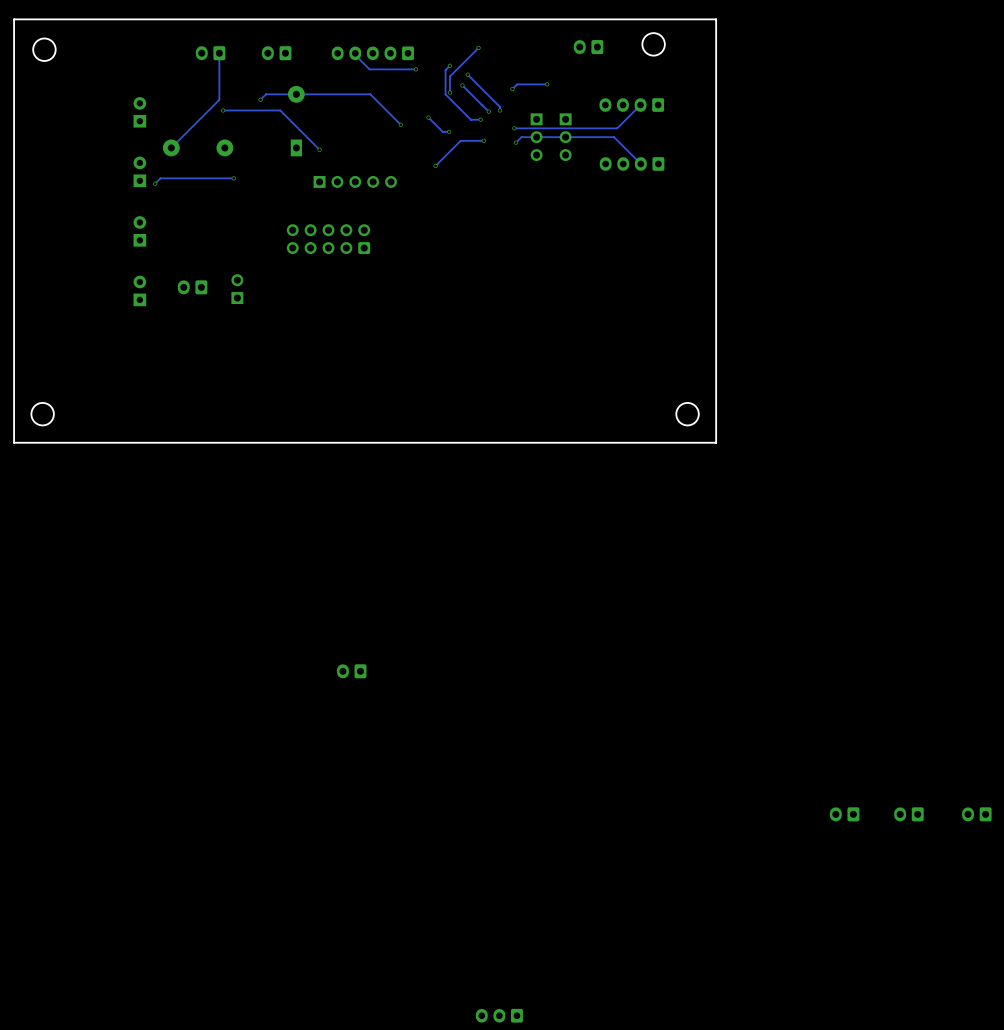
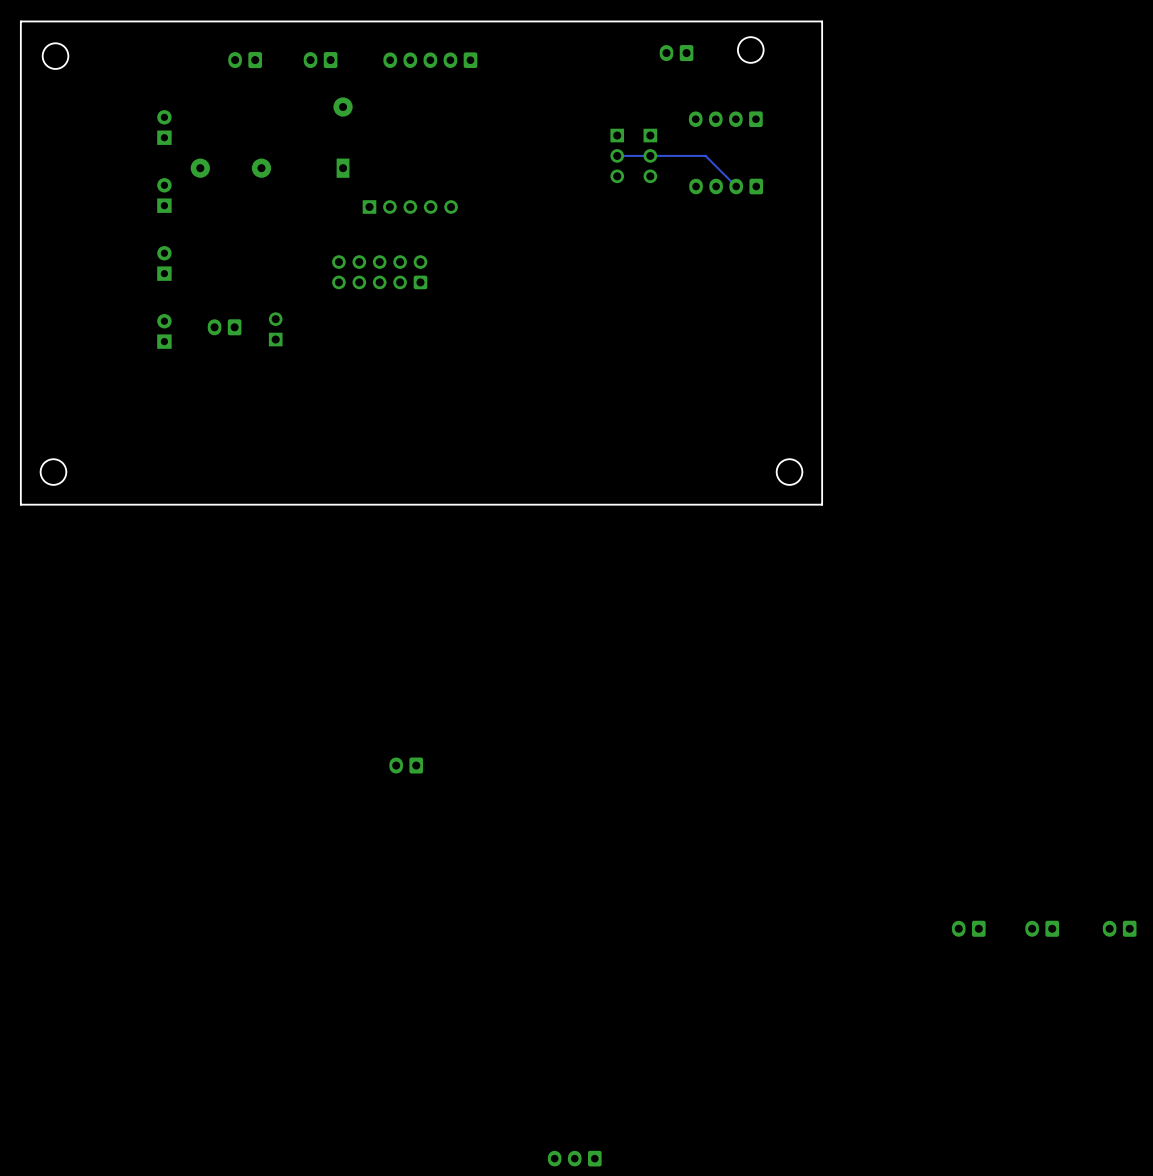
track: (478, 47) (449, 76) (449, 92) -> none
via: (478, 47) -> none
track: (219, 53) (219, 99) (171, 147) -> none
track: (355, 53) (369, 69) (416, 69) -> none
track: (449, 65) (445, 70) (445, 94) (470, 119) (480, 119) -> none
via: (449, 65) -> none
via: (416, 69) -> none
track: (467, 74) (499, 106) (499, 110) -> none
via: (467, 74) -> none
track: (547, 84) (517, 84) (512, 89) -> none
via: (547, 84) -> none
track: (462, 85) (488, 111) -> none
via: (462, 85) -> none
via: (512, 89) -> none
via: (449, 92) -> none
track: (260, 99) (266, 94) (370, 94) (400, 124) -> none
via: (260, 99) -> none
track: (640, 105) (617, 128) (514, 128) -> none
track: (223, 110) (280, 110) (319, 149) -> none
via: (223, 110) -> none
via: (499, 110) -> none
via: (488, 111) -> none
track: (428, 117) (442, 131) (449, 131) -> none
via: (428, 117) -> none
via: (480, 119) -> none
via: (400, 124) -> none
via: (514, 128) -> none
via: (449, 131) -> none
track: (536, 137) (521, 137) (516, 142) -> none
track: (483, 140) (460, 140) (435, 165) -> none
via: (483, 140) -> none
via: (516, 142) -> none
via: (319, 149) -> none
via: (435, 165) -> none
track: (233, 178) (160, 178) (155, 183) -> none
via: (233, 178) -> none
via: (155, 183) -> none

